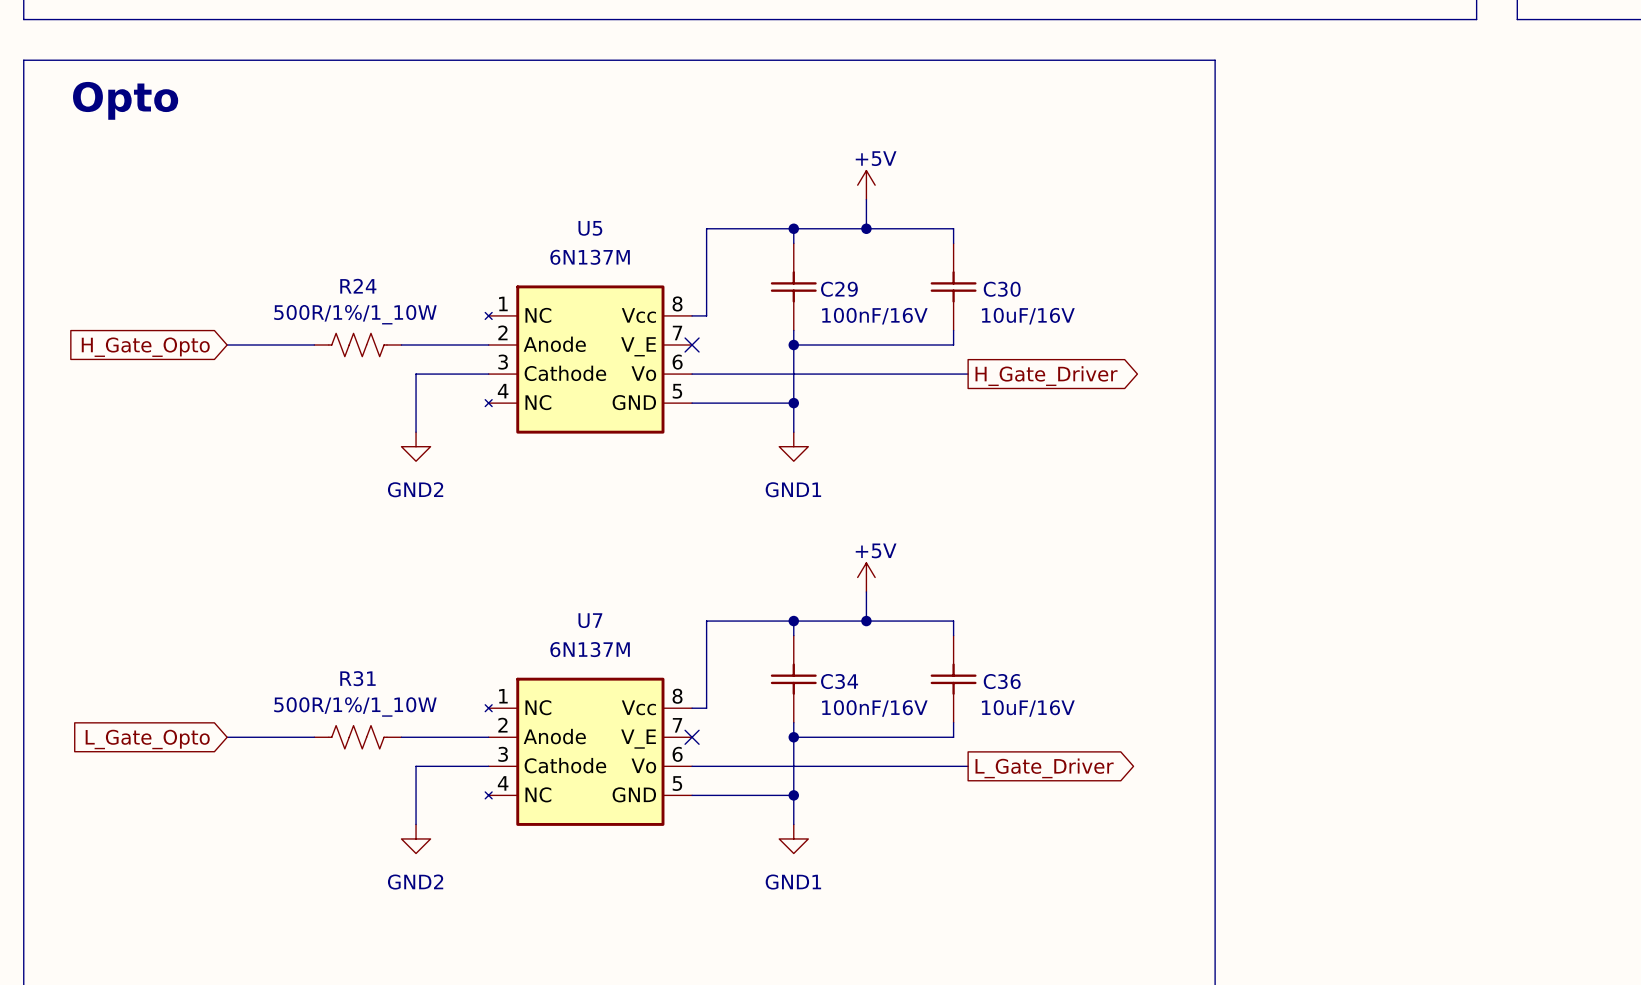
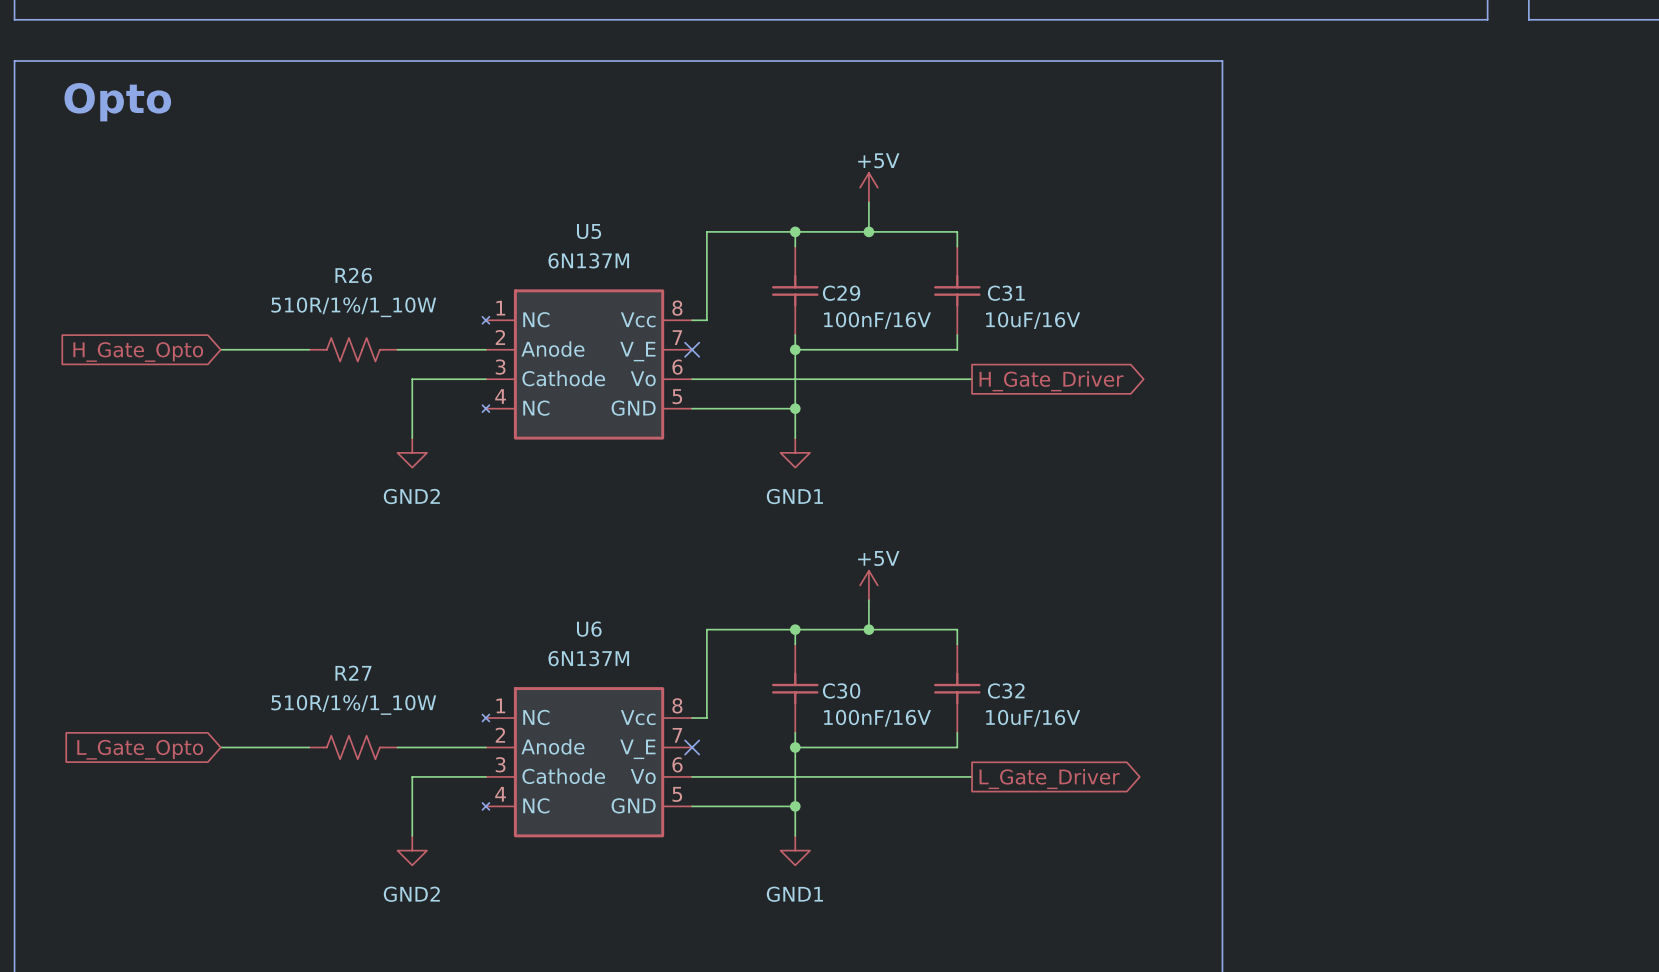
R24 name: R24 (358, 286) -> R26 (353, 275)
C30 name: C30 (1002, 289) -> C31 (1006, 293)
R24 value: 500R/1%/1_10W (355, 314) -> 510R/1%/1_10W (353, 307)
U7 name: U7 (590, 620) -> U6 (589, 629)
R31 name: R31 (357, 678) -> R27 (353, 673)
C34 name: C34 (839, 681) -> C30 (841, 690)
C36 name: C36 (1002, 681) -> C32 (1006, 690)
R31 value: 500R/1%/1_10W (355, 706) -> 510R/1%/1_10W (353, 704)

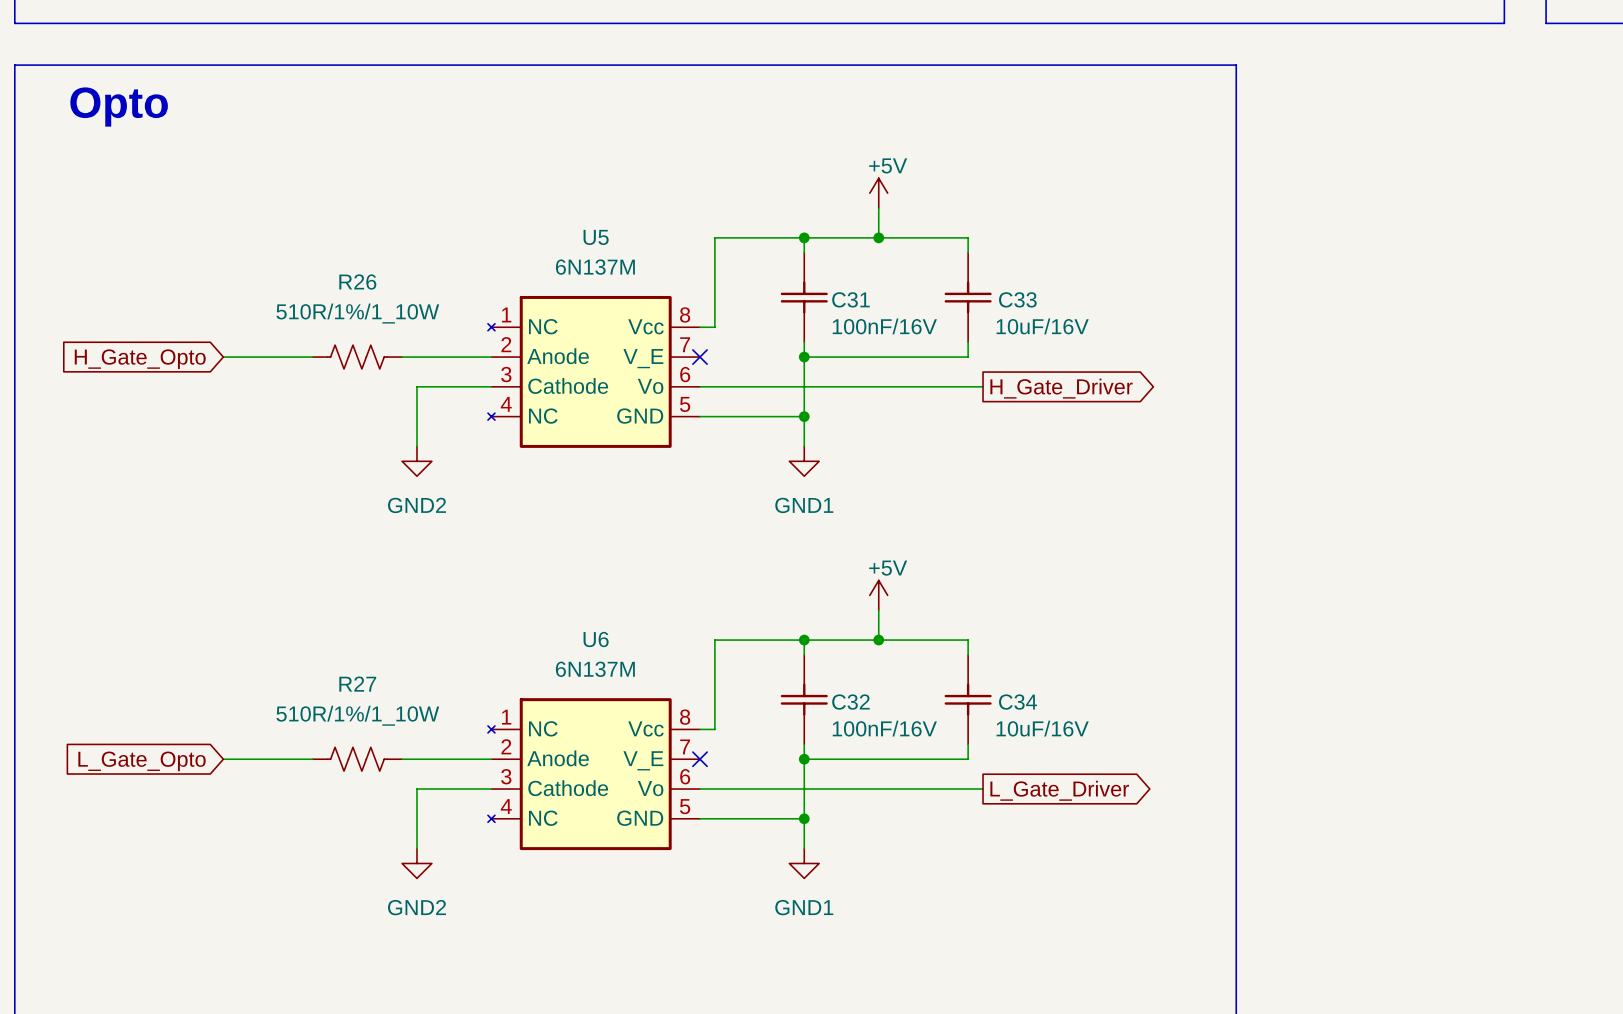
C29 name: C29 (841, 293) -> C31 (850, 299)
C31 name: C31 (1006, 293) -> C33 (1017, 299)
C30 name: C30 (841, 690) -> C32 (850, 702)
C32 name: C32 (1006, 690) -> C34 (1018, 702)

